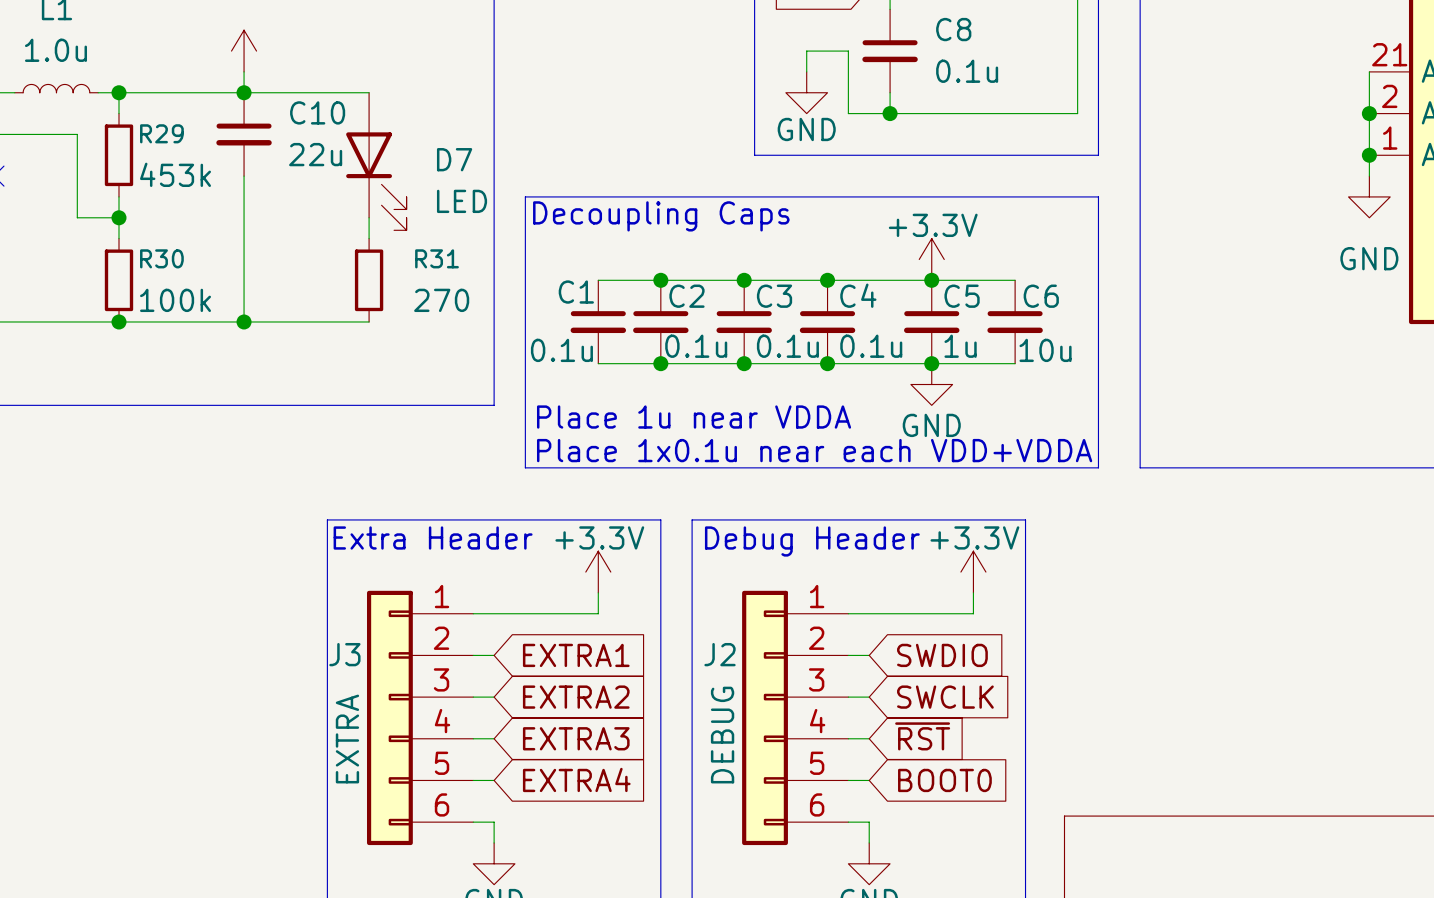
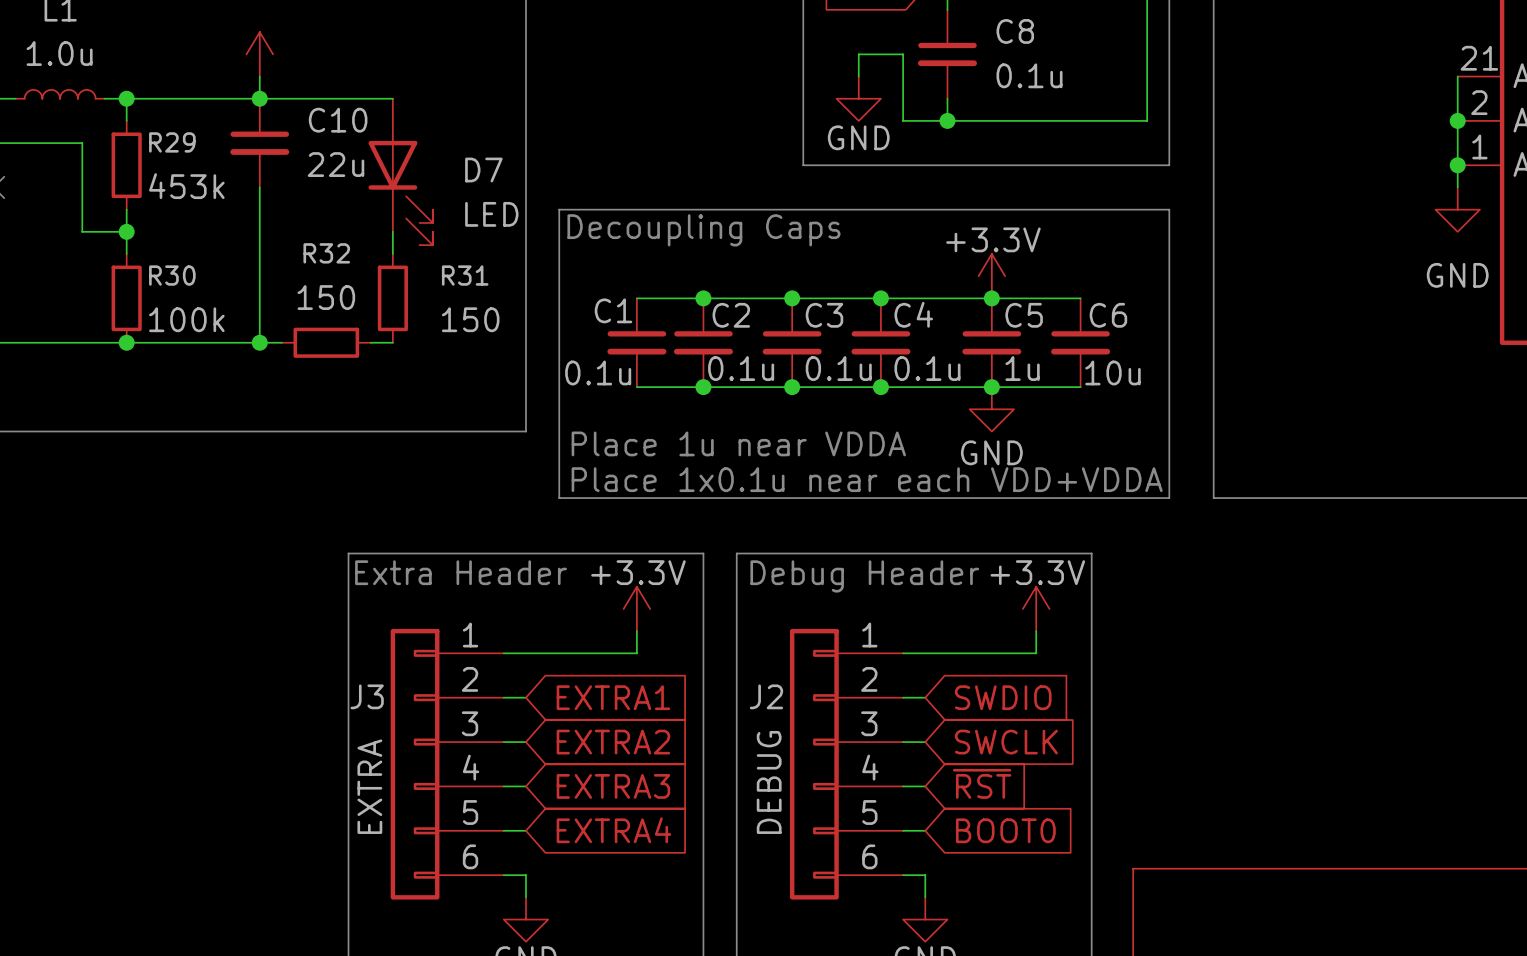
R31 value: 270 (441, 300) -> 150 (470, 319)
wire: (264, 321) (348, 321) -> none
R32: none -> 150 (326, 342)

